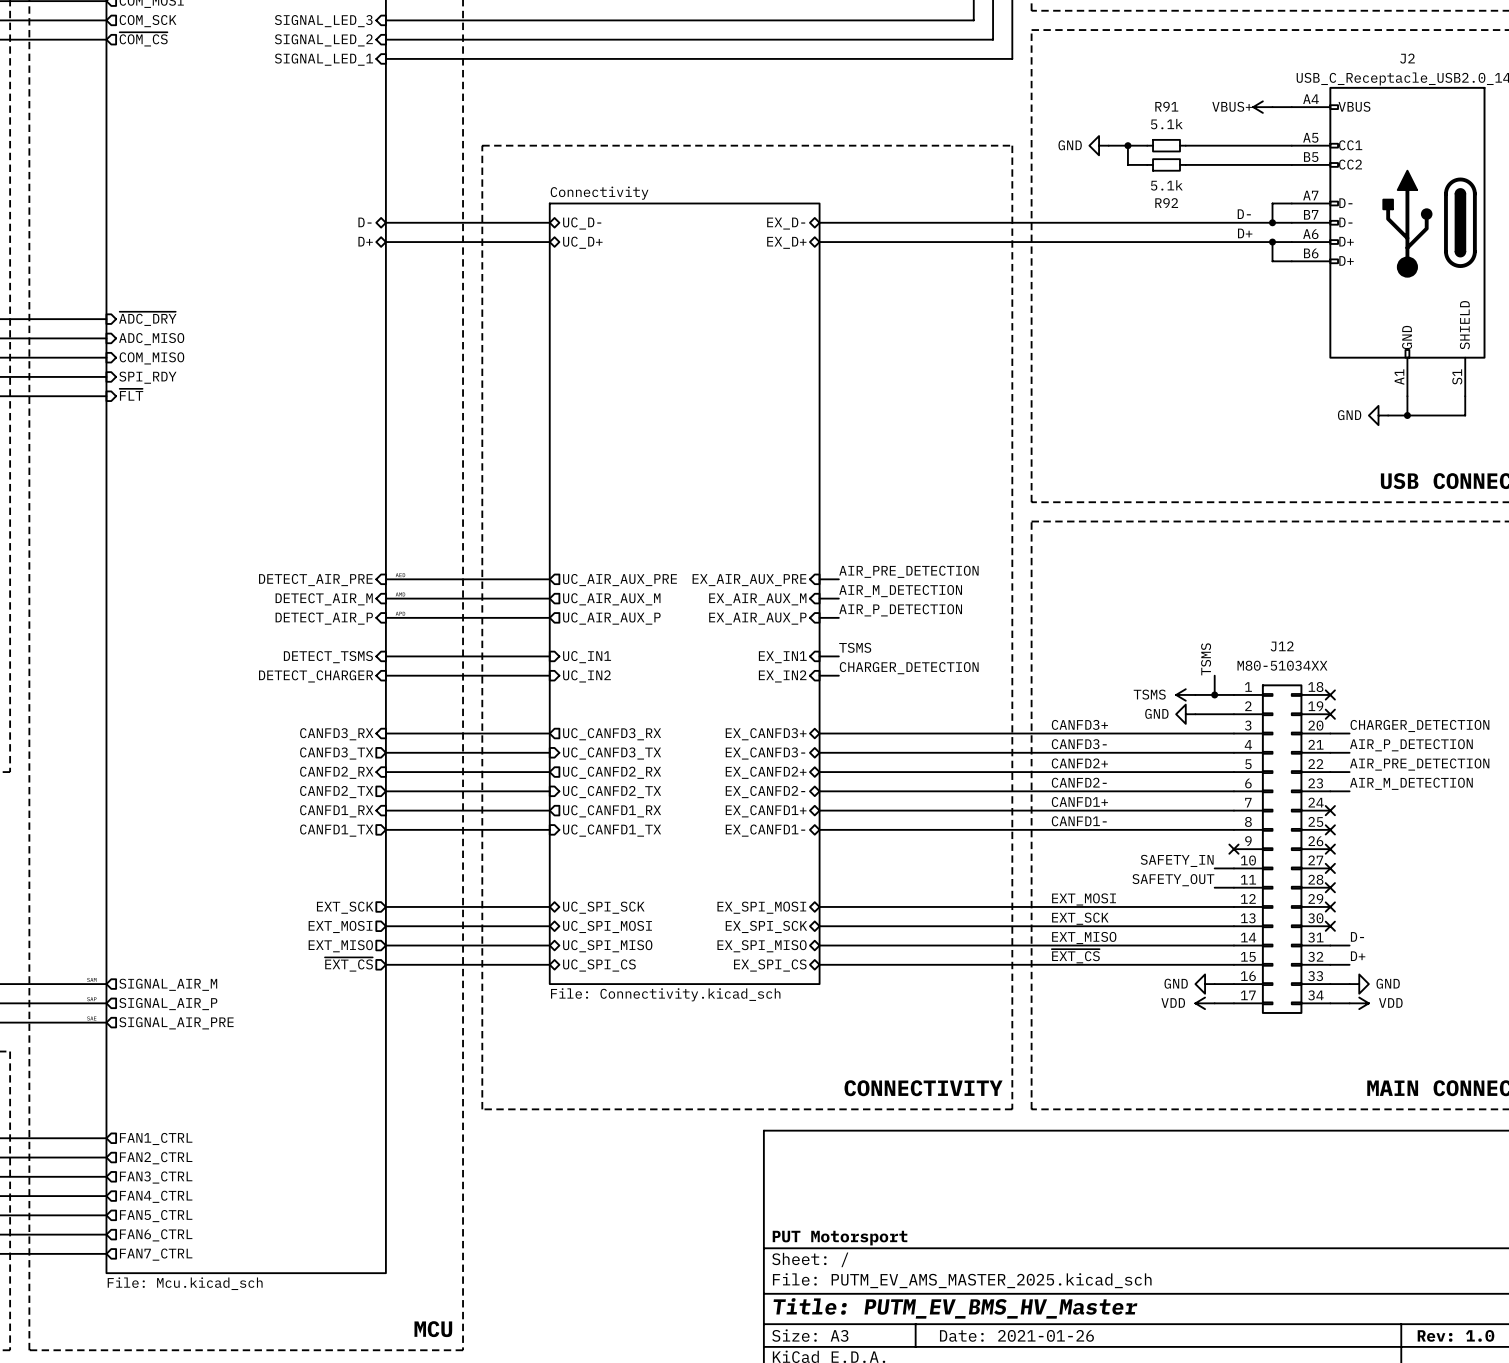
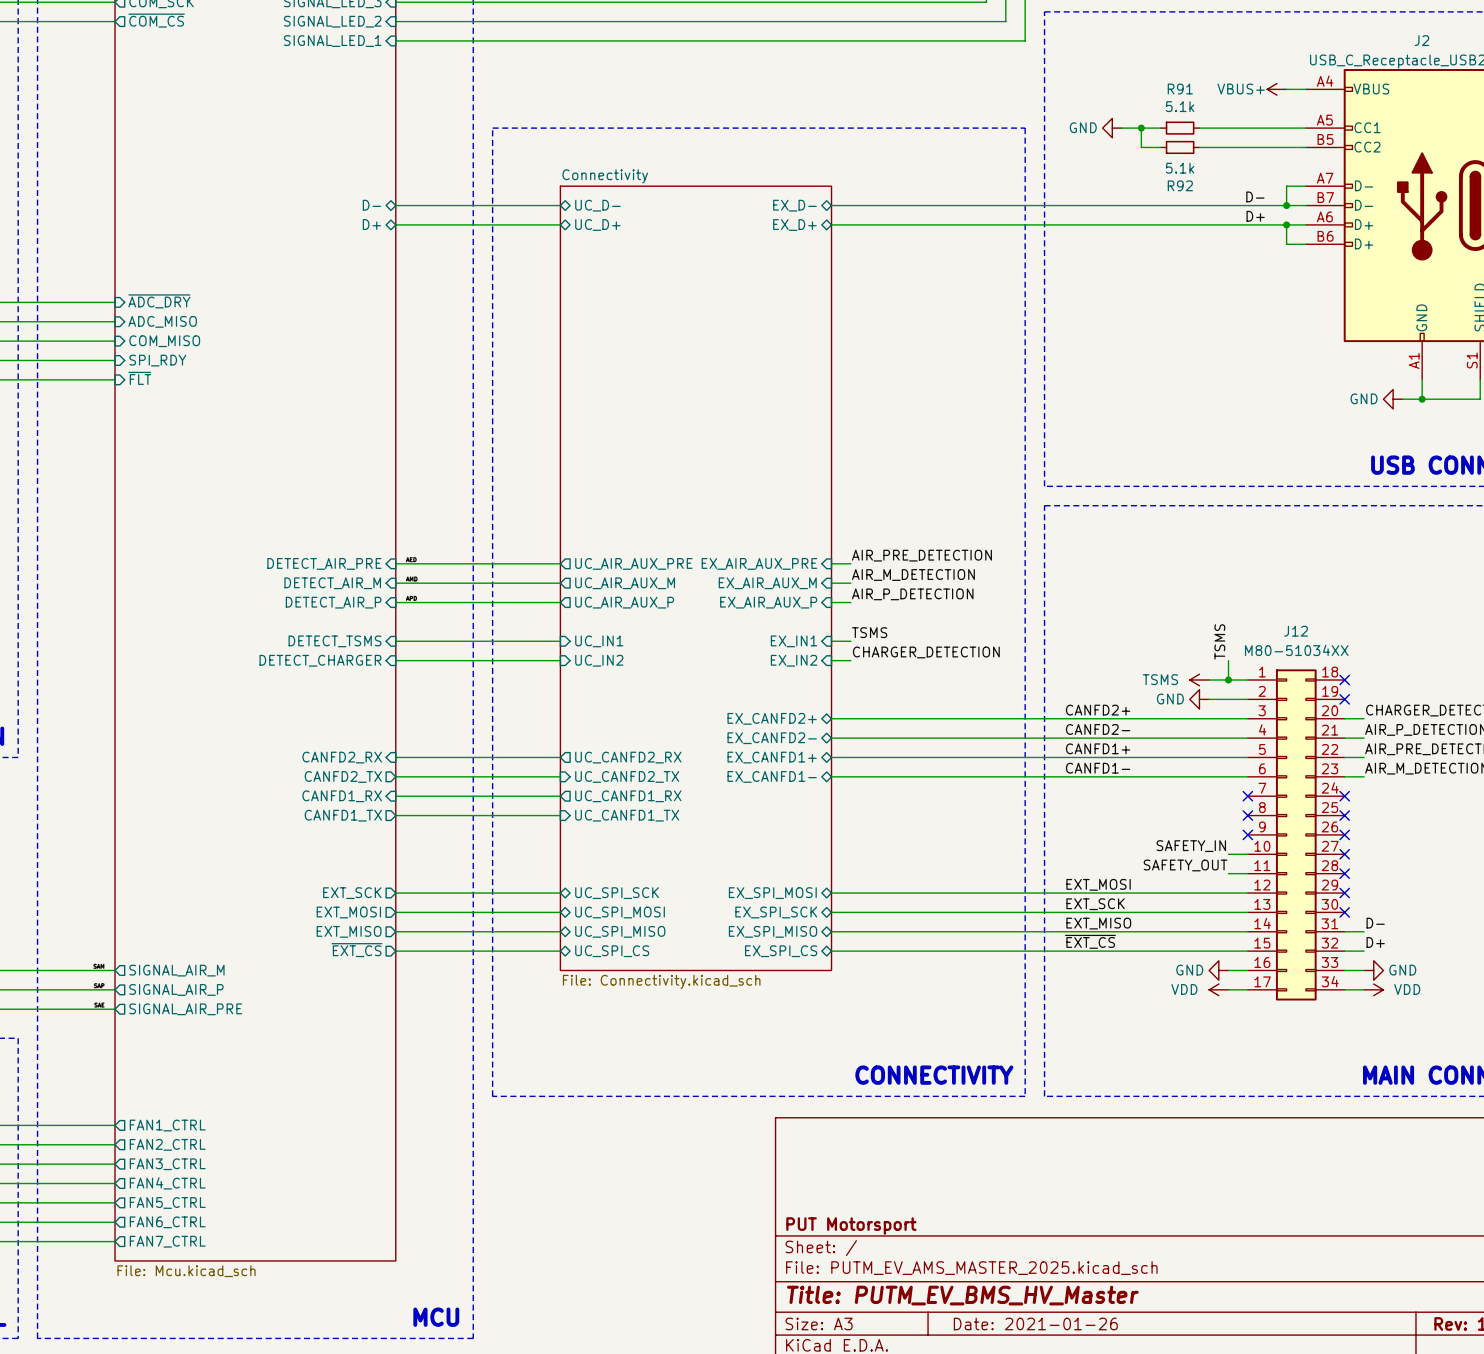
label: CANFD3+ (1079, 724) -> CANFD2+ (1098, 710)
wire: (385, 733) (549, 733) -> none
sheet pin: CANFD3_RX (336, 734) -> none
sheet pin: UC_CANFD3_RX (612, 734) -> none
sheet pin: EX_CANFD3+ (766, 734) -> EX_CANFD2+ (772, 718)
label: CANFD3- (1079, 744) -> CANFD2- (1098, 729)
wire: (385, 752) (549, 752) -> none
sheet pin: CANFD3_TX (336, 753) -> none
sheet pin: UC_CANFD3_TX (612, 753) -> none
sheet pin: EX_CANFD3- (765, 753) -> EX_CANFD2- (772, 738)
label: CANFD2+ (1079, 763) -> CANFD1+ (1098, 748)
sheet pin: EX_CANFD2+ (766, 772) -> EX_CANFD1+ (772, 757)
label: CANFD2- (1079, 782) -> CANFD1- (1098, 768)
sheet pin: EX_CANFD2- (765, 792) -> EX_CANFD1- (772, 776)
label: CANFD1+ (1079, 802) -> none
wire: (819, 810) (1233, 810) -> none
no-connect mark: none -> (1247, 796)
sheet pin: EX_CANFD1+ (766, 811) -> none
label: CANFD1- (1079, 821) -> none
wire: (819, 829) (1233, 829) -> none
no-connect mark: none -> (1247, 815)
sheet pin: EX_CANFD1- (765, 830) -> none

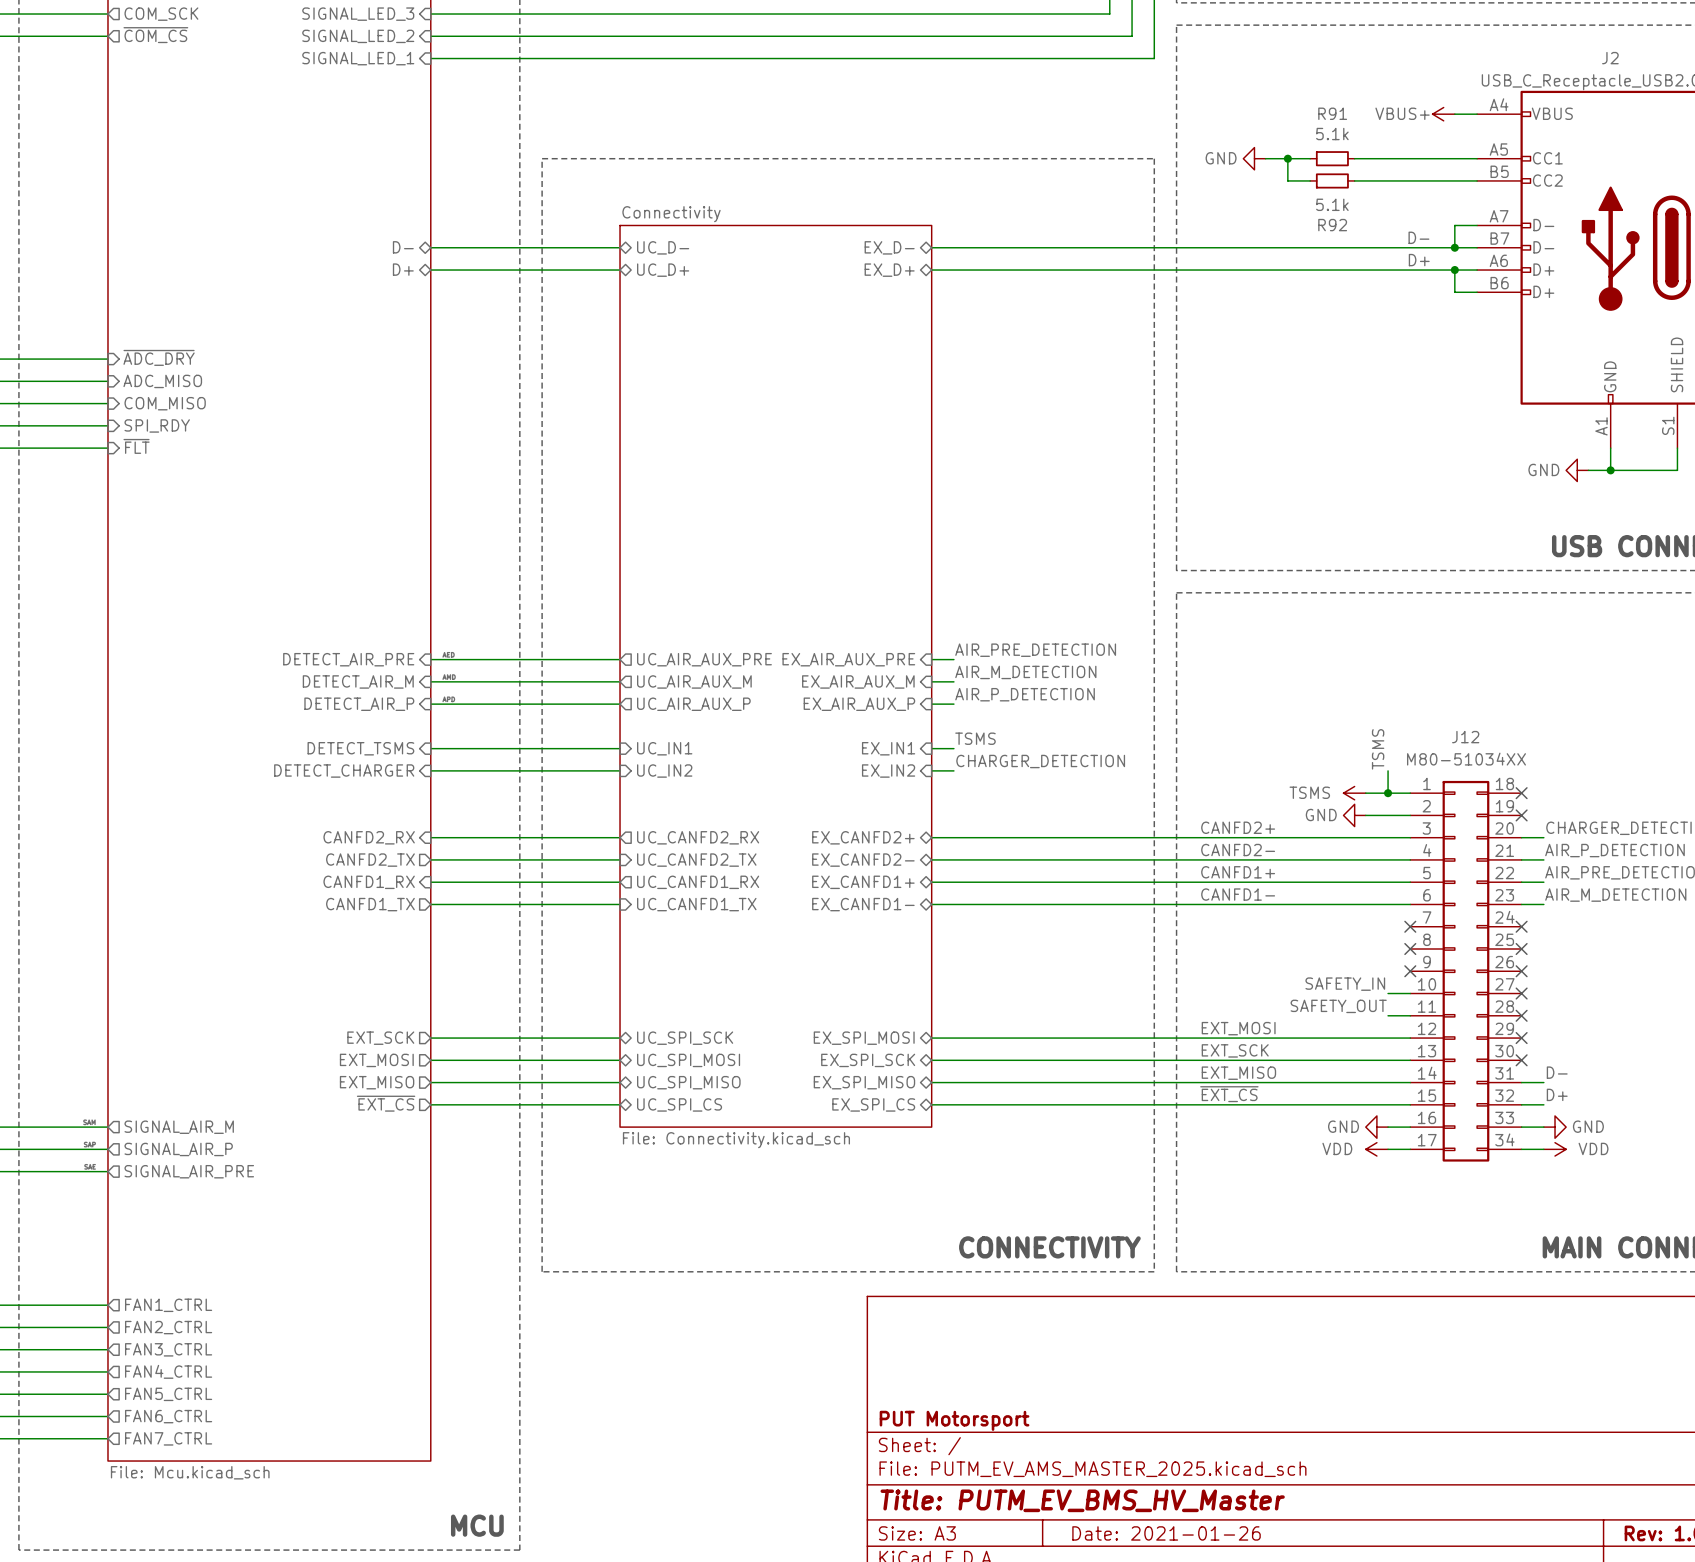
sheet pin: none -> CANFD2_RX (369, 837)
sheet pin: none -> UC_CANFD2_RX (698, 837)
sheet pin: none -> CANFD2_TX (370, 860)
sheet pin: none -> UC_CANFD2_TX (696, 860)
sheet pin: CANFD2_RX (342, 757) -> CANFD1_RX (369, 882)
sheet pin: UC_CANFD2_RX (628, 757) -> UC_CANFD1_RX (698, 882)
sheet pin: CANFD2_TX (343, 776) -> CANFD1_TX (370, 904)
sheet pin: UC_CANFD2_TX (627, 776) -> UC_CANFD1_TX (696, 904)
sheet pin: CANFD1_RX (342, 796) -> none
wire: (395, 796) (560, 796) -> (430, 837) (620, 837)
sheet pin: UC_CANFD1_RX (628, 796) -> none
sheet pin: CANFD1_TX (343, 815) -> none
wire: (395, 815) (560, 815) -> (430, 859) (620, 859)
sheet pin: UC_CANFD1_TX (627, 815) -> none

